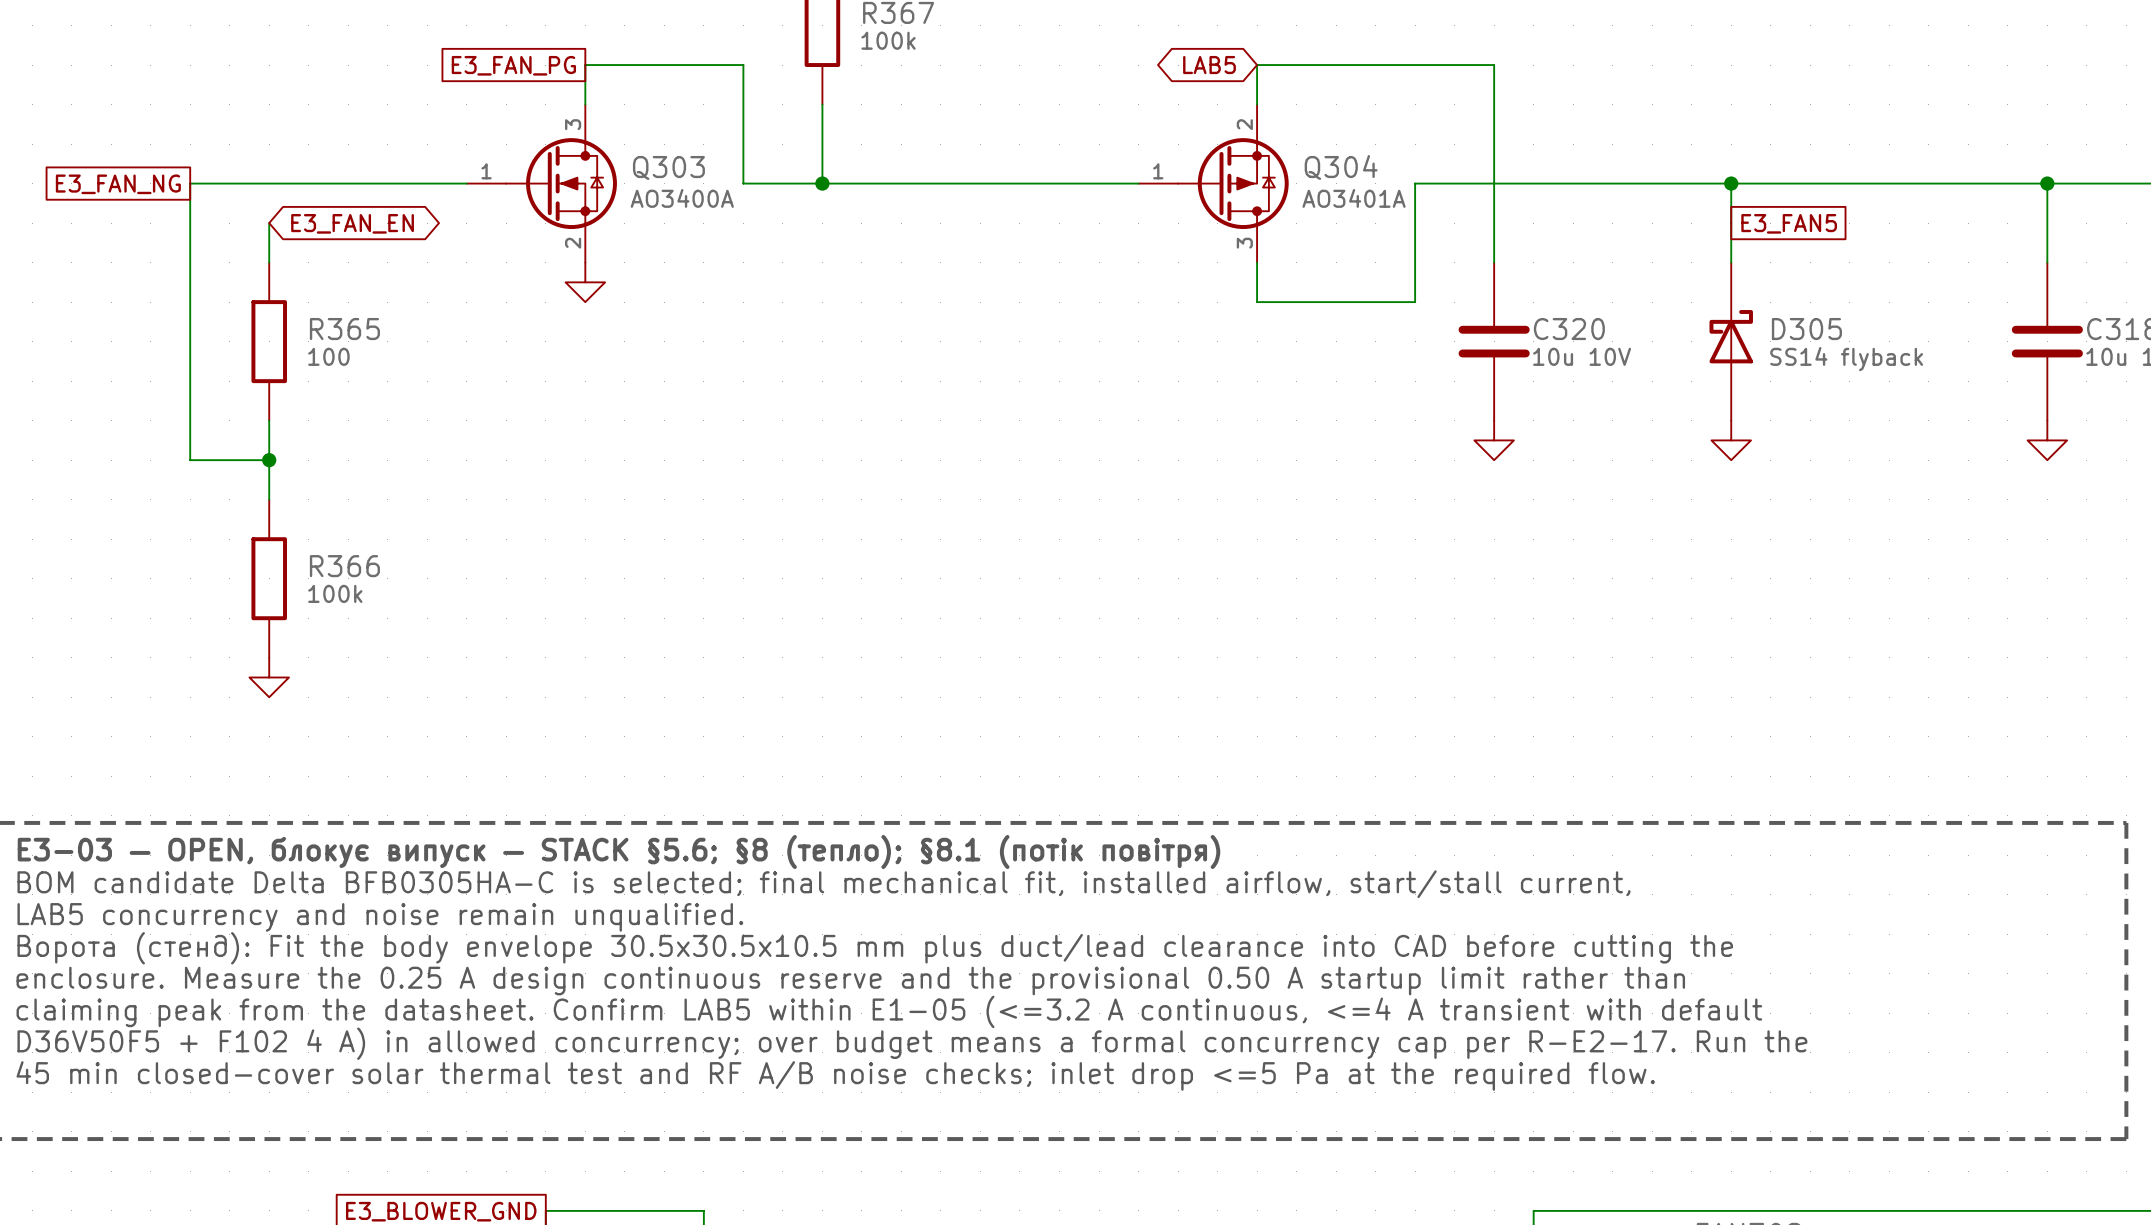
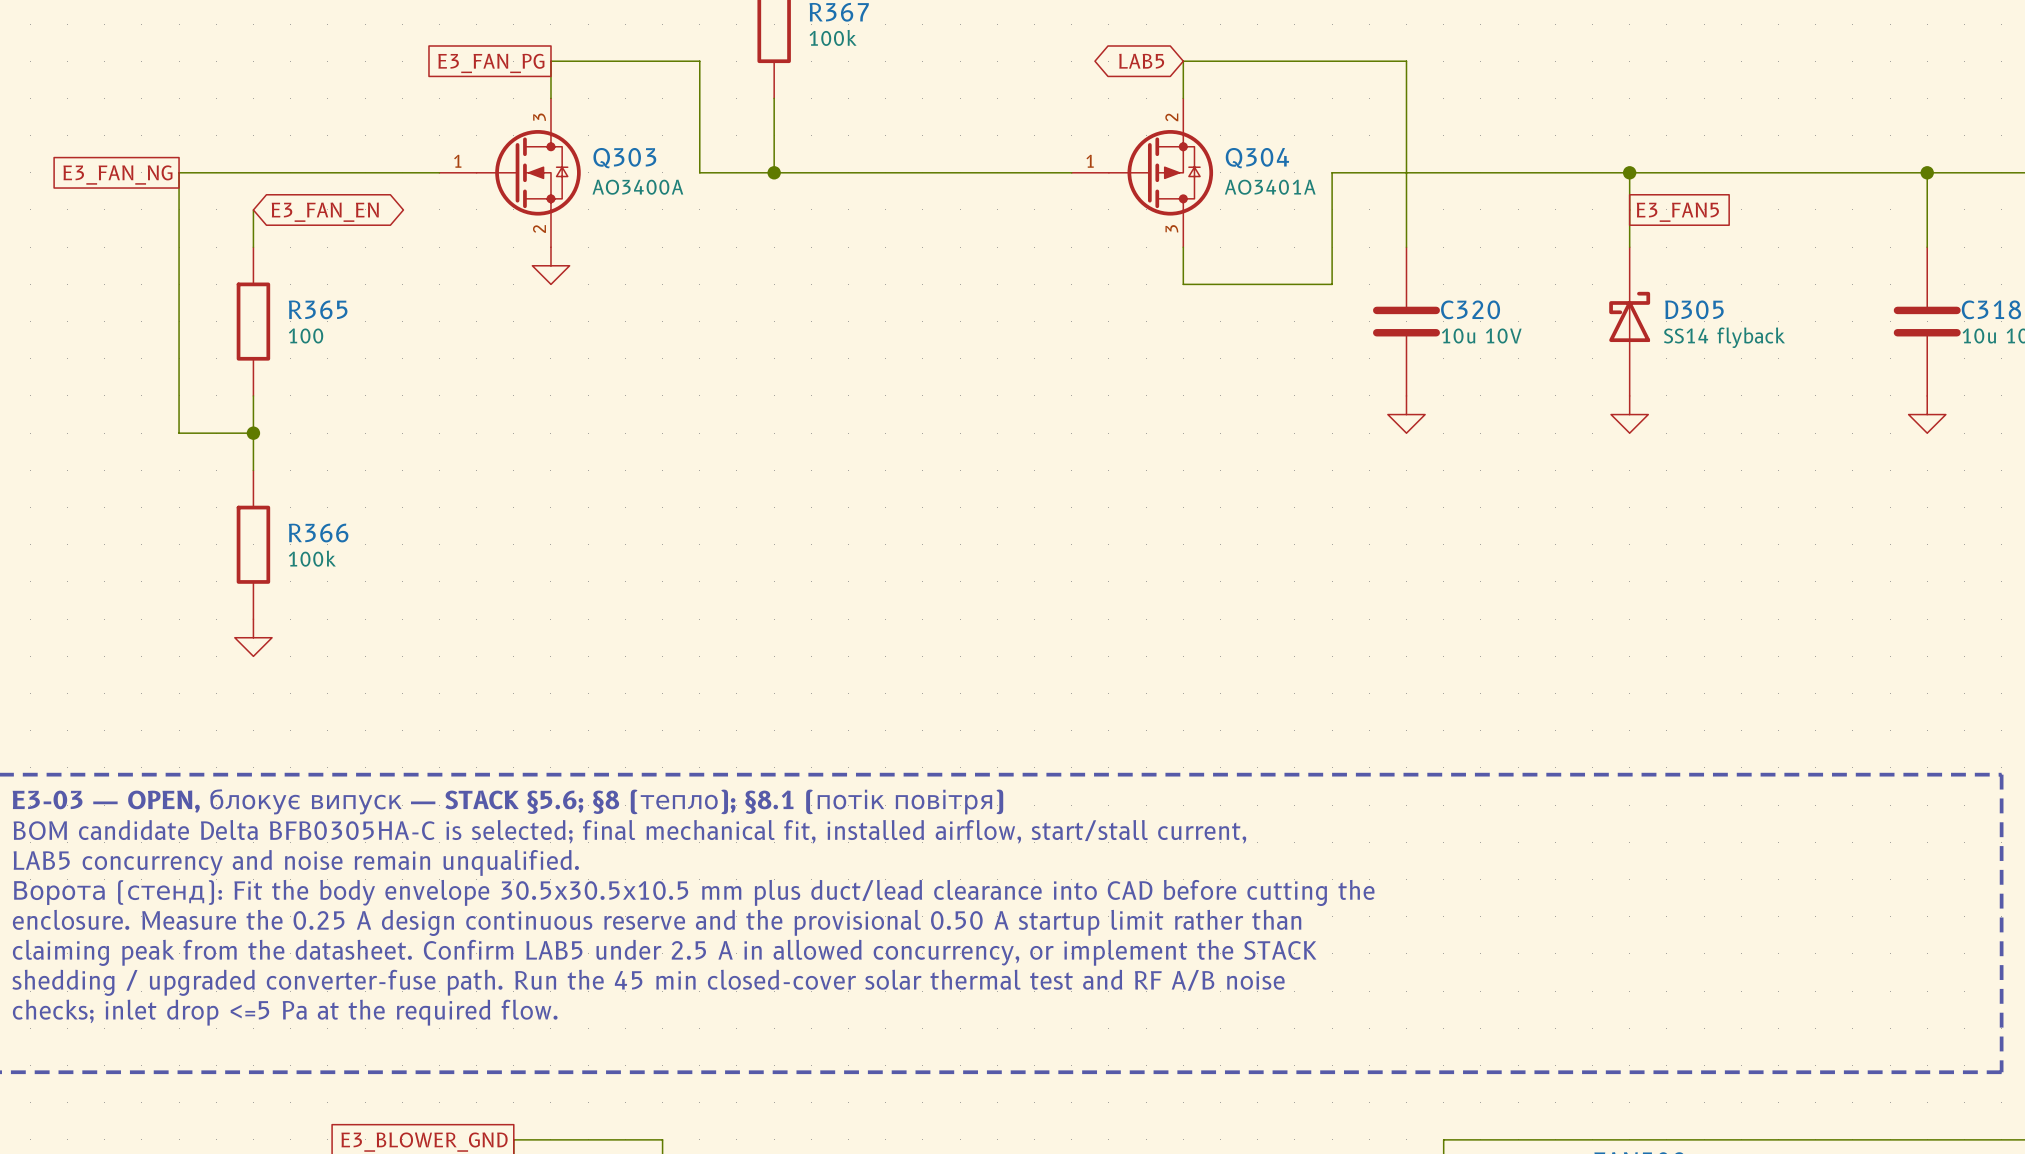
text: claiming peak from the datasheet. Confirm LAB5 within E1-05 (<=3.2 A continuous, <=4 A transient with default (889, 1011) -> claiming peak from the datasheet. Confirm LAB5 under 2.5 A in allowed concurrency, or implement the STACK (664, 952)
text: D36V50F5 + F102 4 A) in allowed concurrency; over budget means a formal concurrency cap per R-E2-17. Run the (912, 1043) -> shedding / upgraded converter-fuse path. Run the 45 min closed-cover solar thermal test and RF A/B noise (648, 982)
text: 45 min closed-cover solar thermal test and RF A/B noise checks; inlet drop <=5 Pa at the required flow. (835, 1075) -> checks; inlet drop <=5 Pa at the required flow. (285, 1012)

